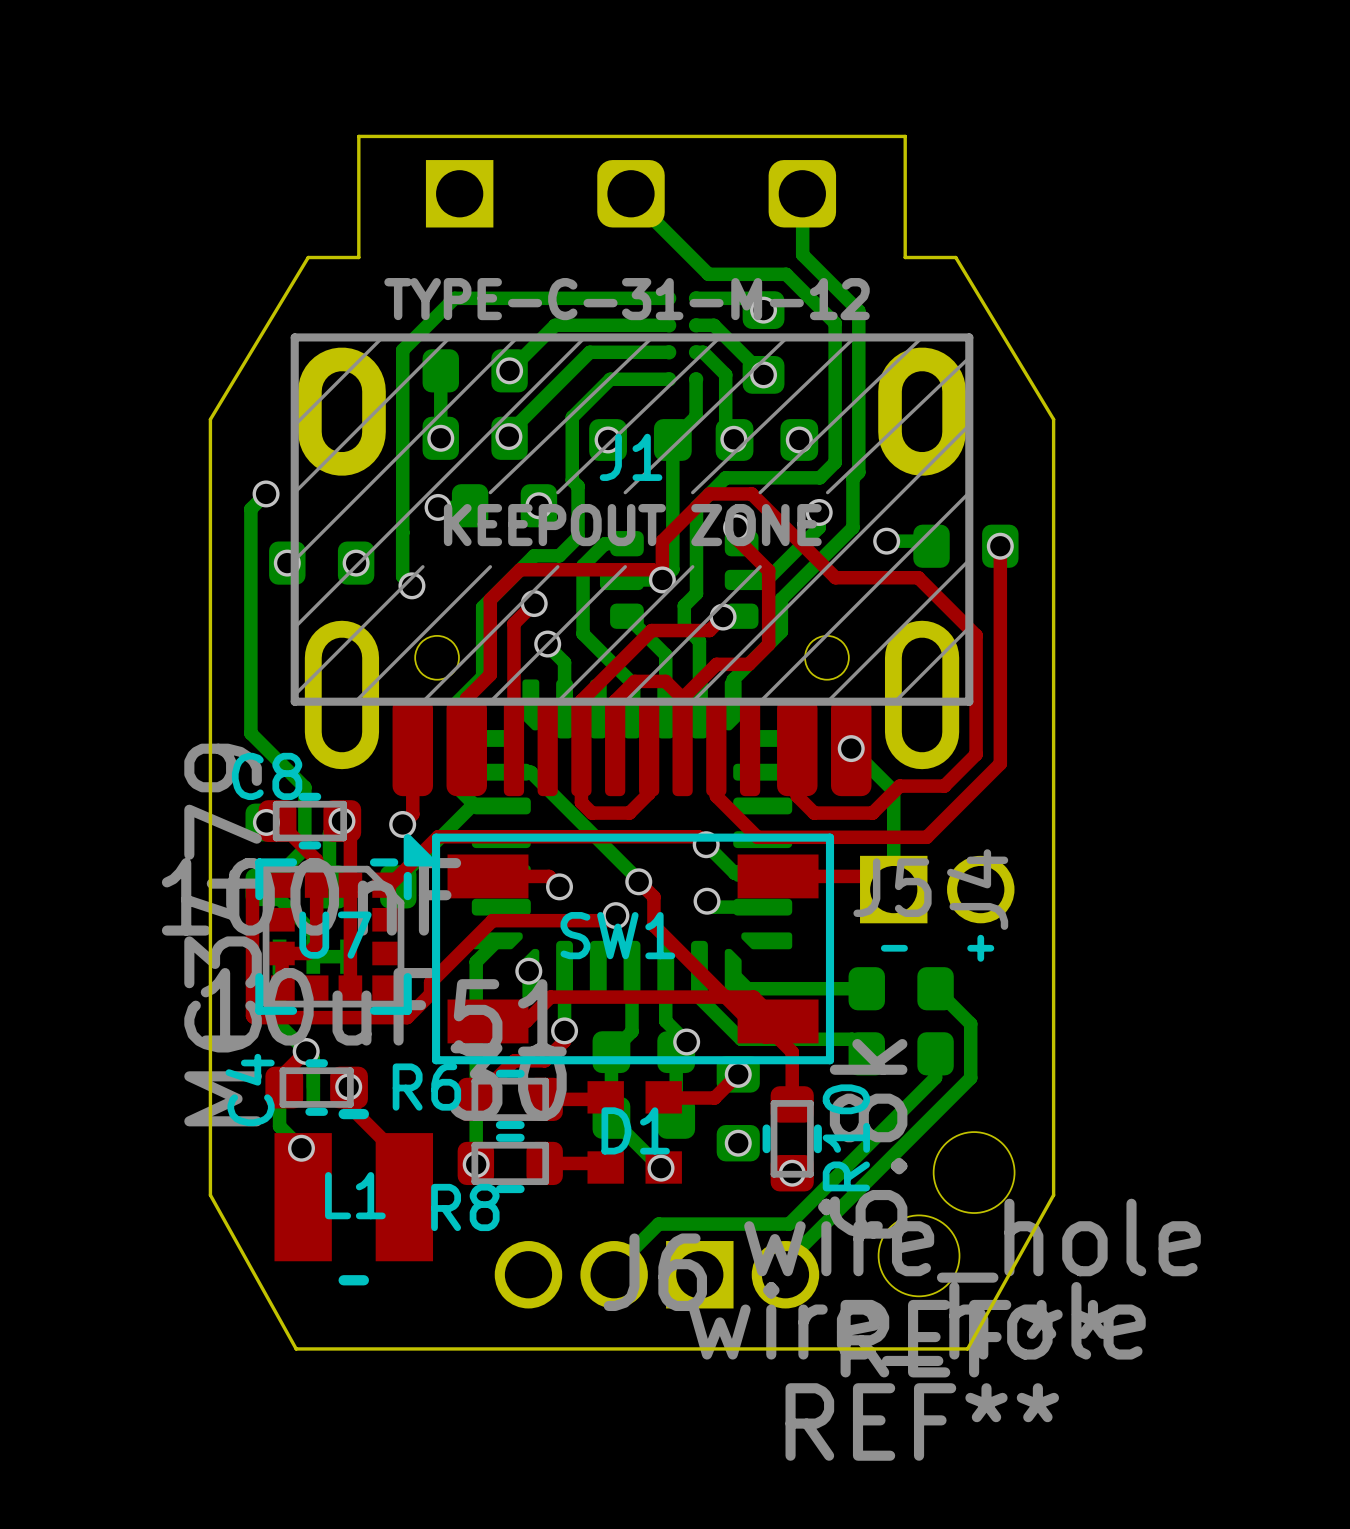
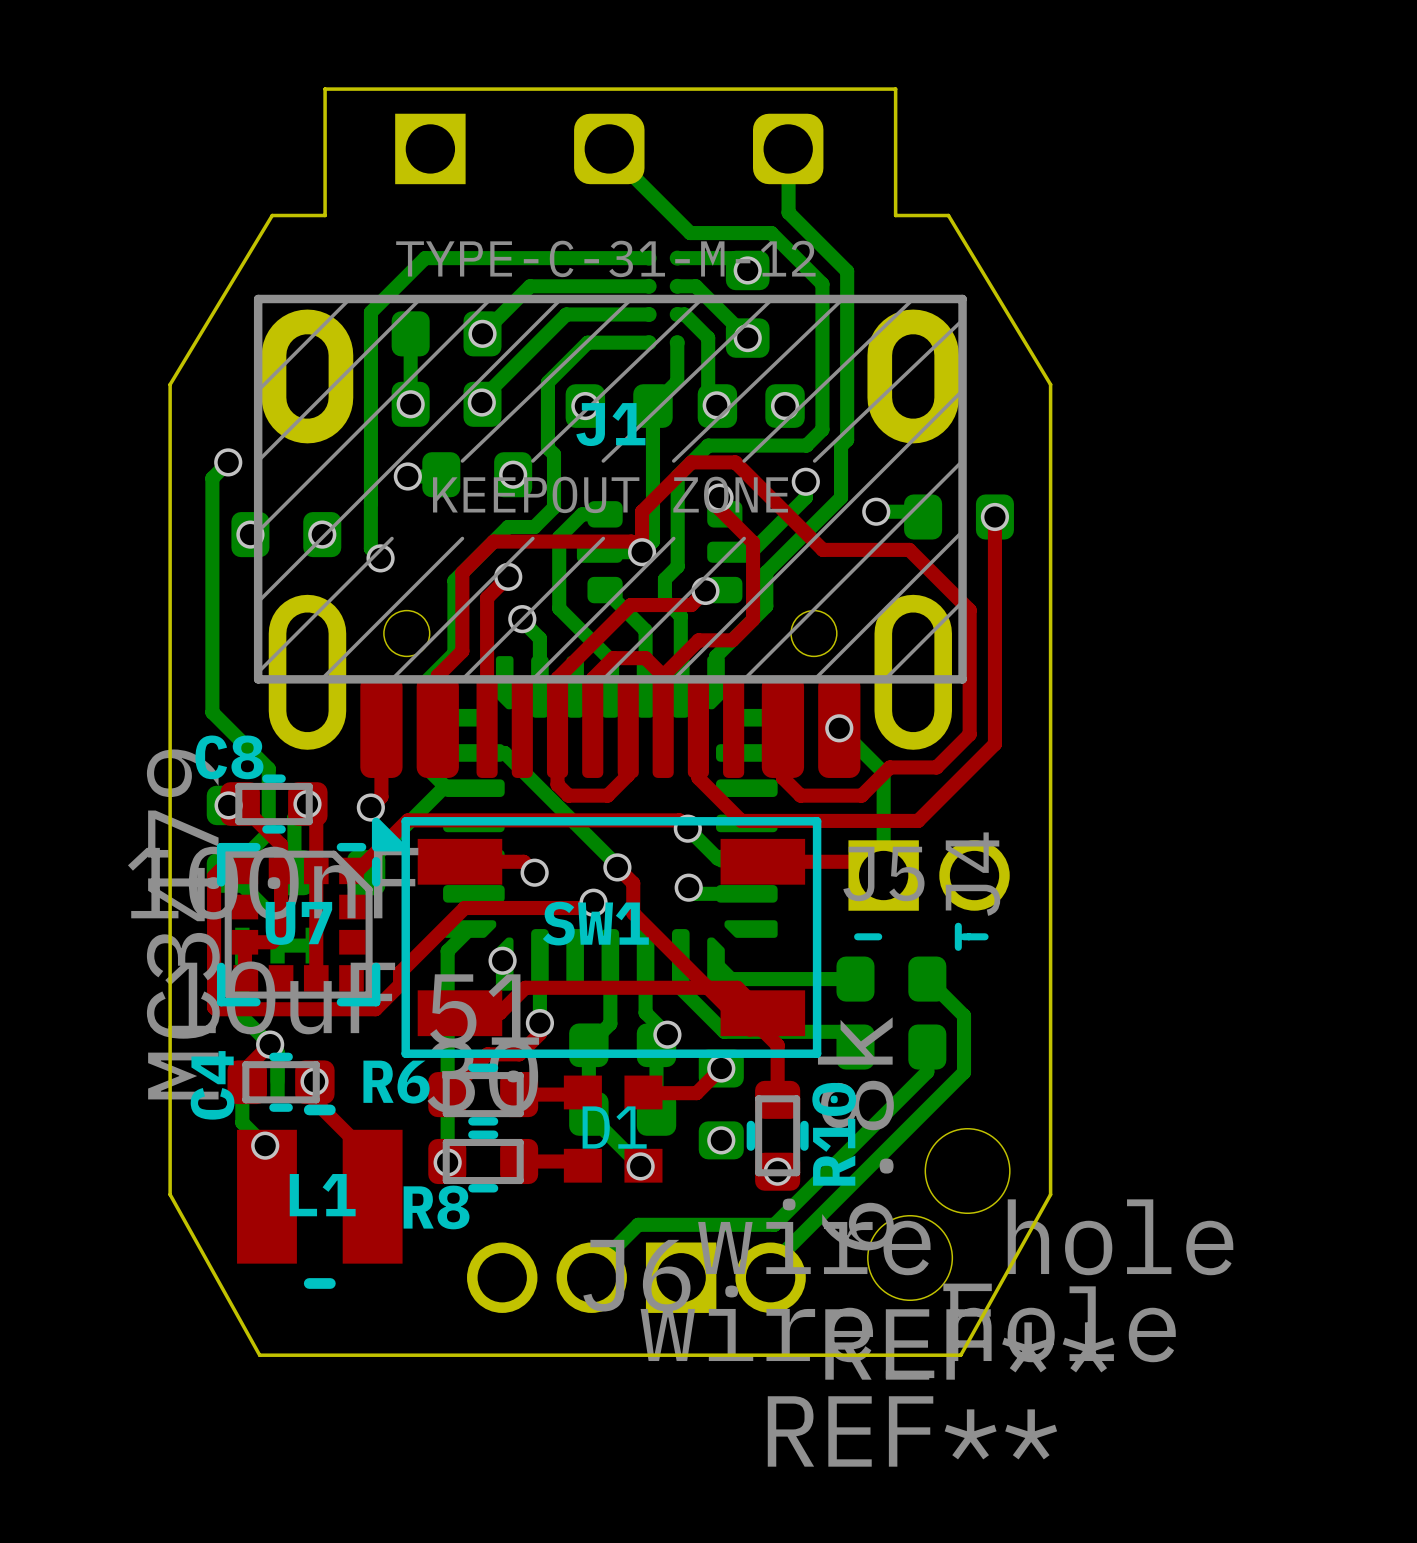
line: (980, 938) (980, 958) -> (958, 926) (958, 947)
line: (889, 948) (904, 948) -> (857, 936) (873, 936)

